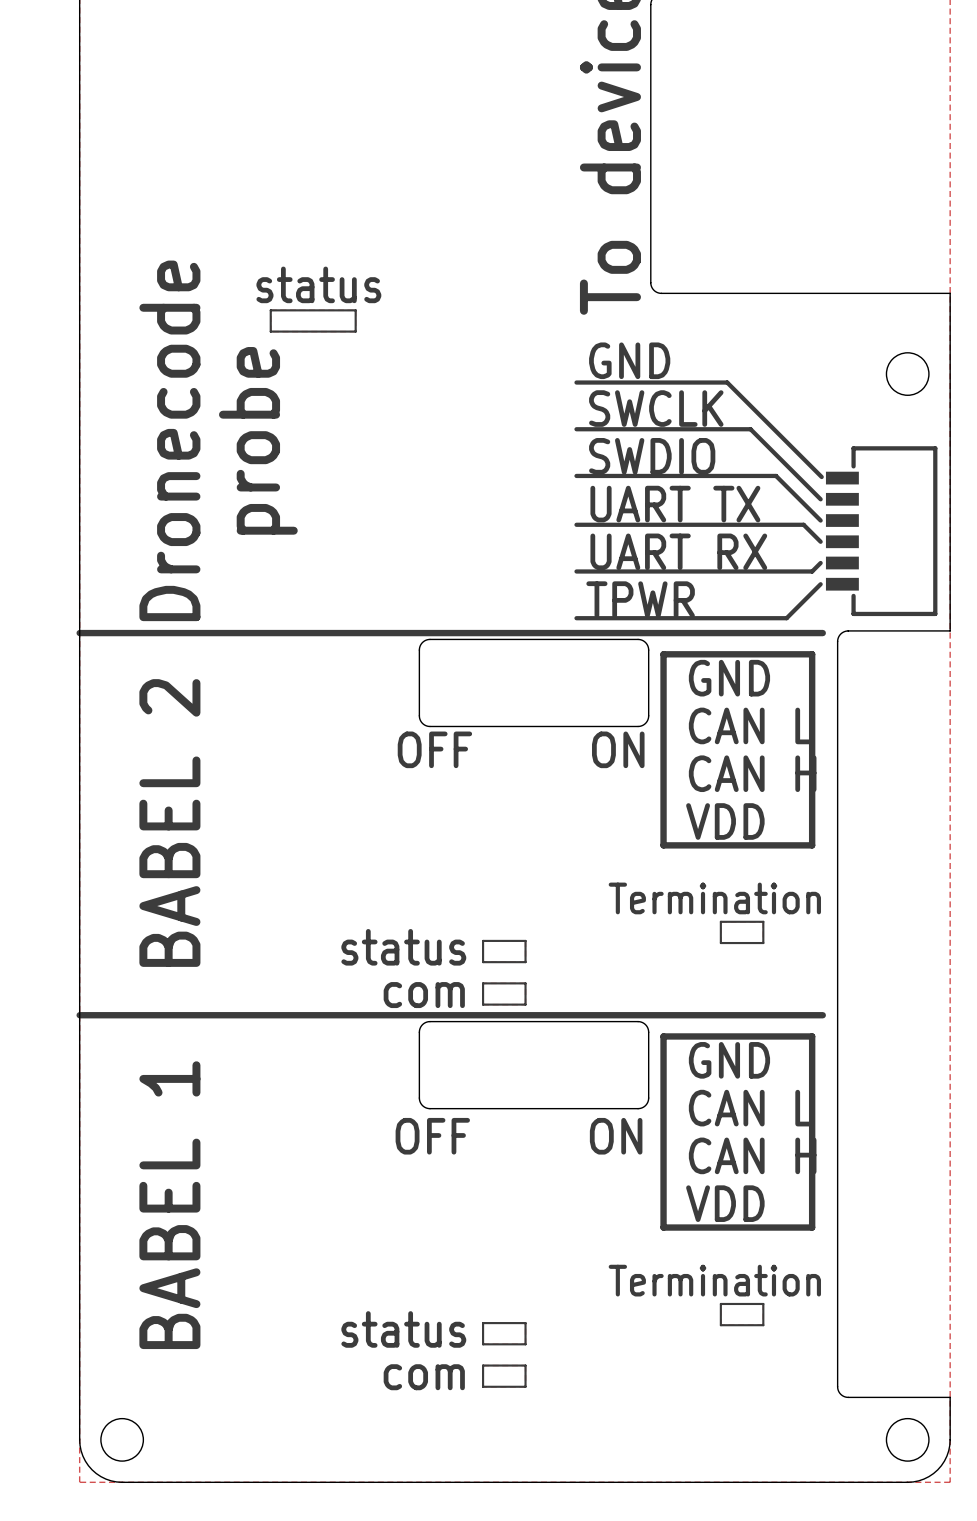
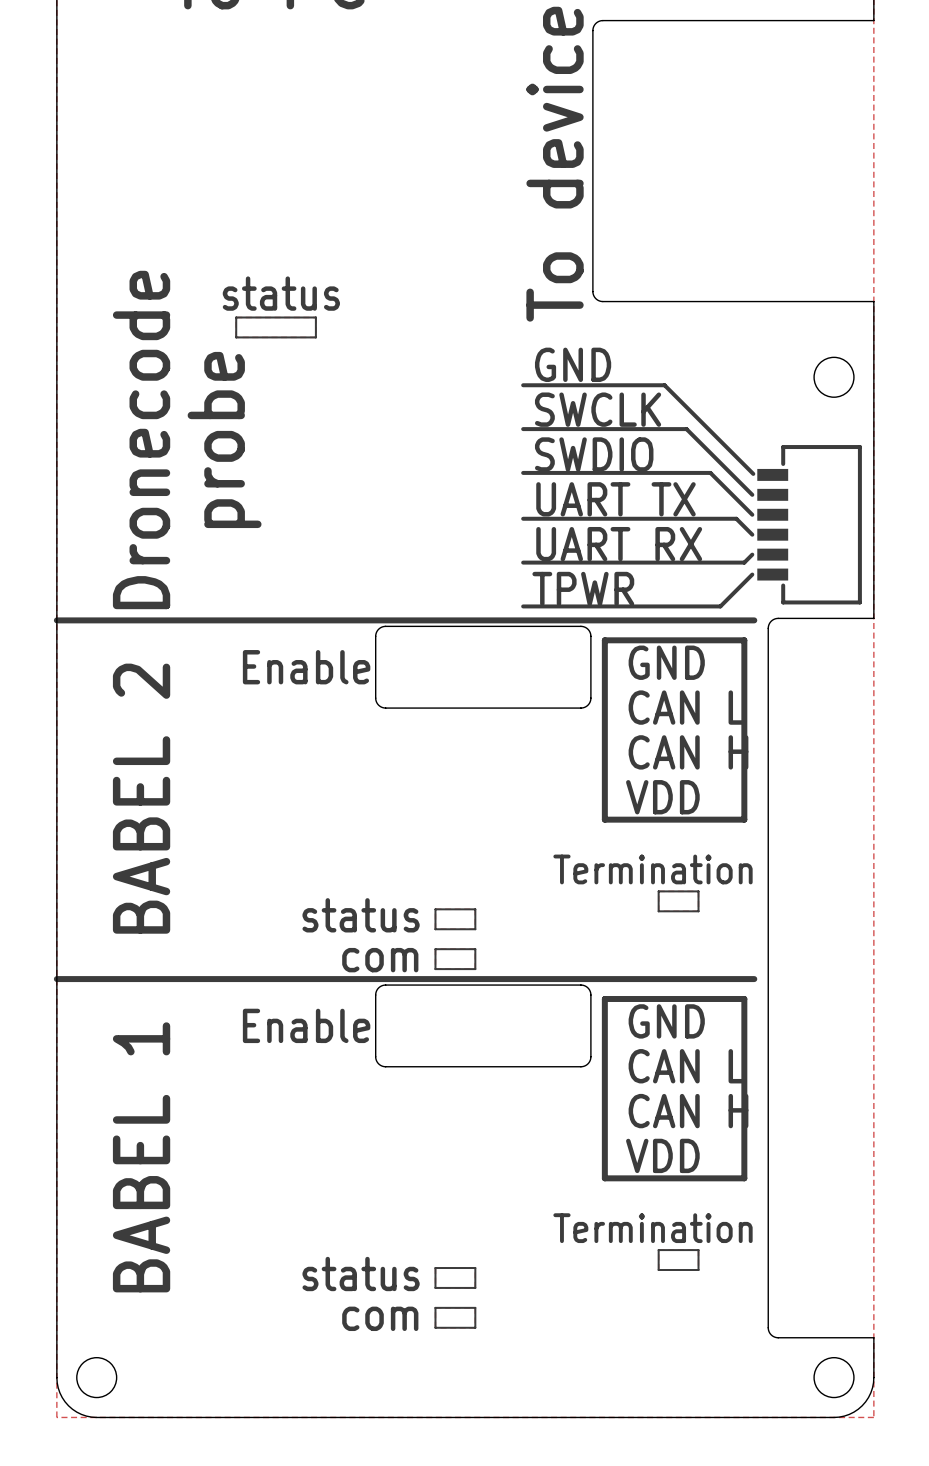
text: none -> Enable (306, 667)
text: OFF (434, 749) -> none
text: ON (618, 749) -> none
text: none -> Enable (306, 1025)
text: OFF (432, 1136) -> none
text: ON (616, 1136) -> none

